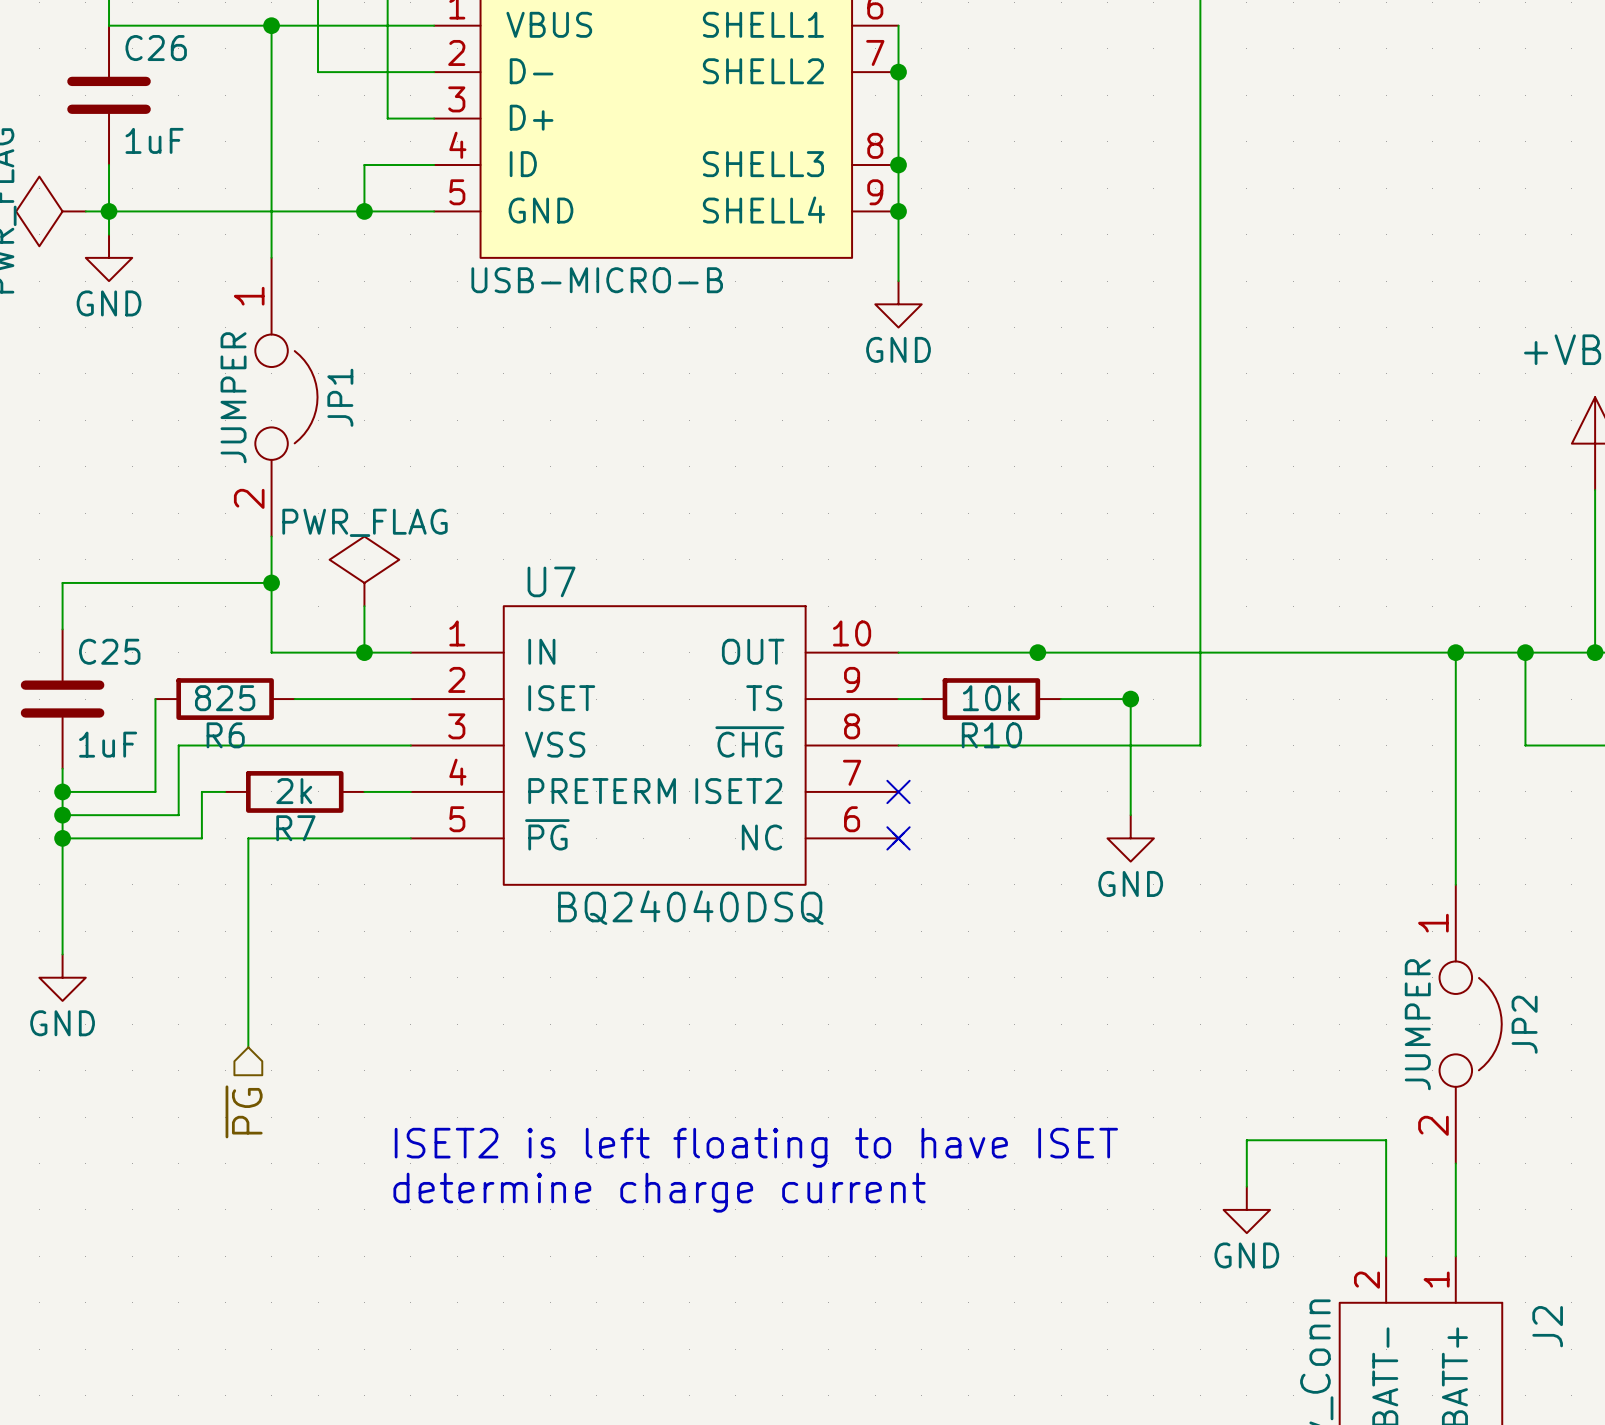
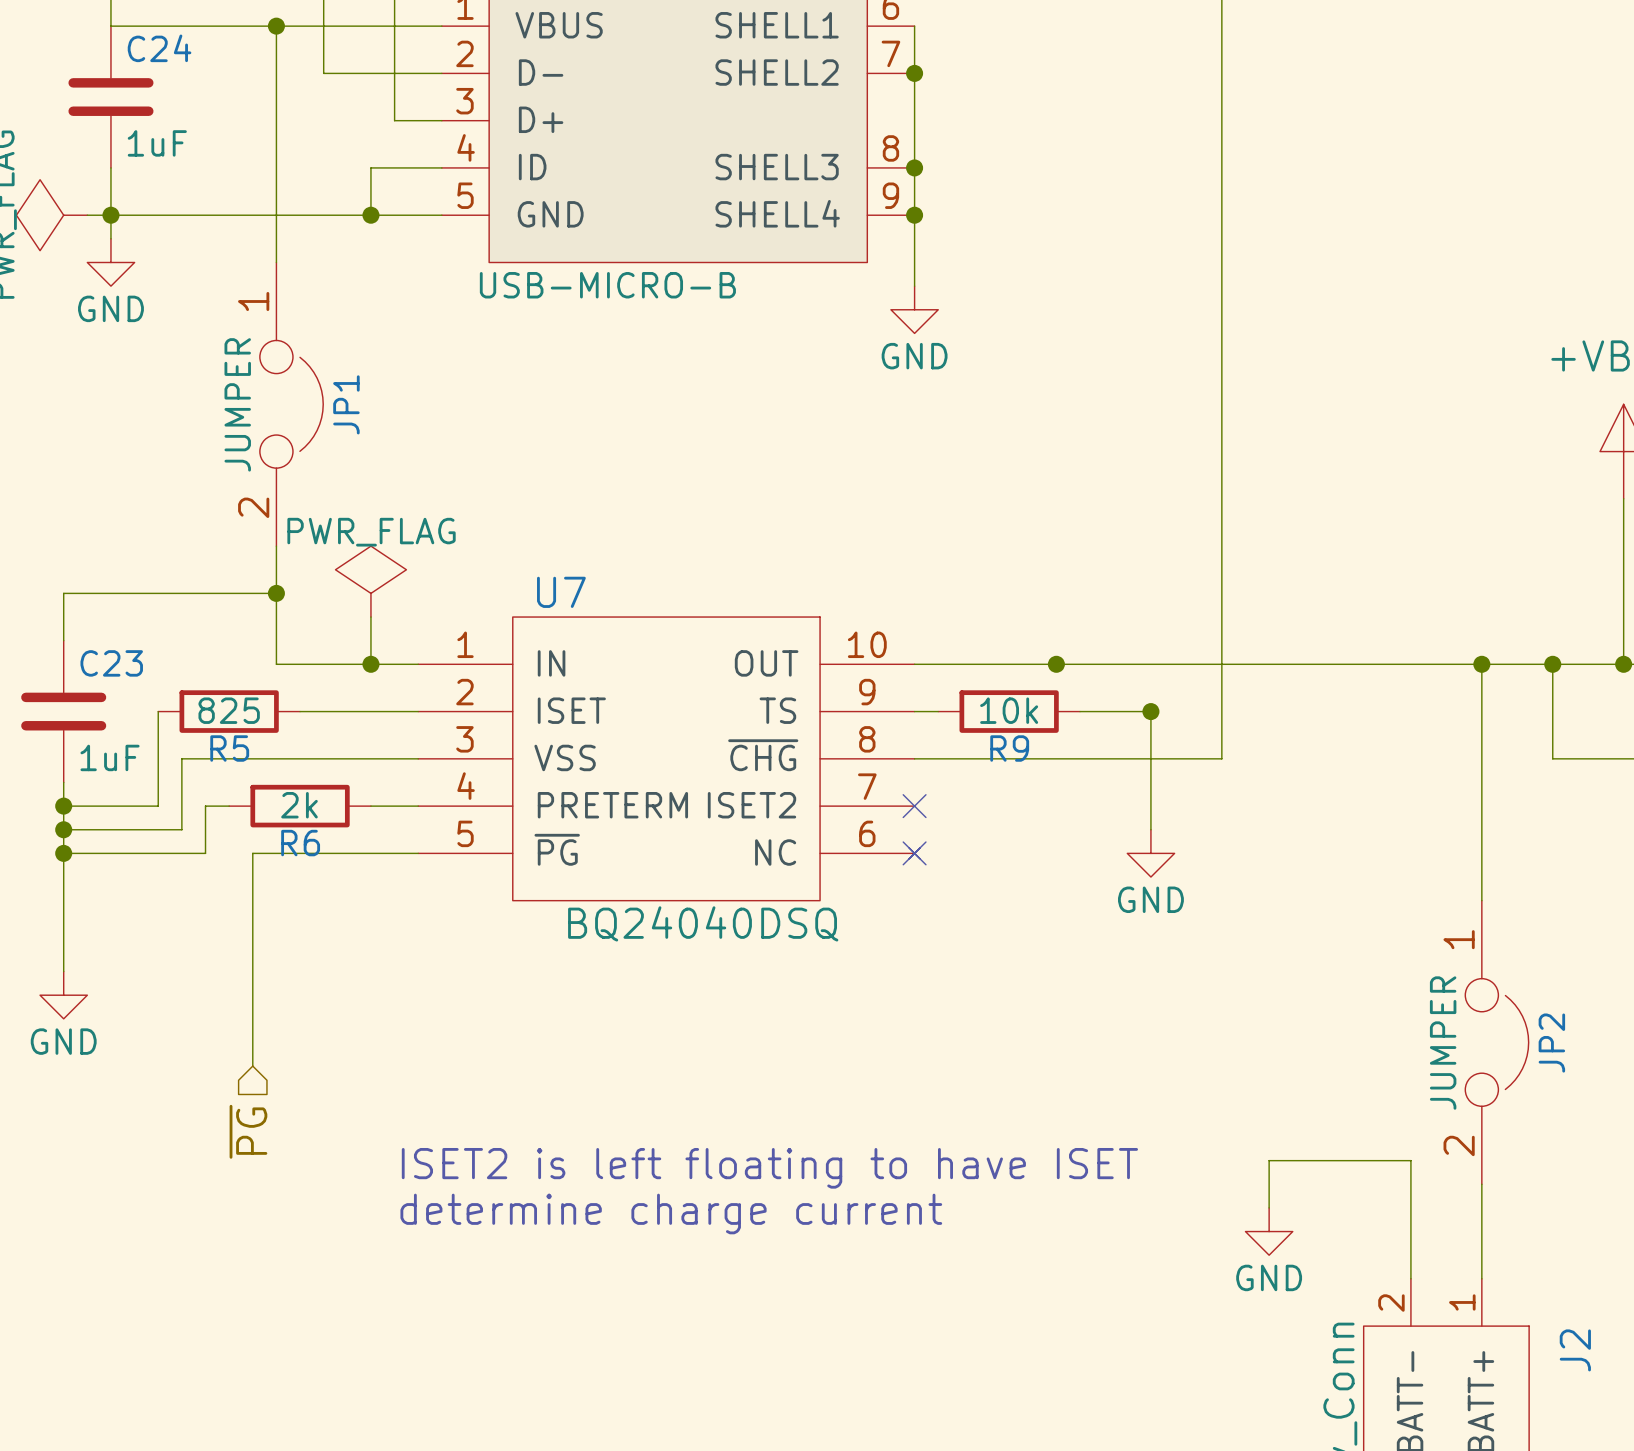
C26 name: C26 (156, 48) -> C24 (159, 48)
C25 name: C25 (109, 651) -> C23 (111, 663)
R6 name: R6 (225, 735) -> R5 (229, 748)
R10 name: R10 (991, 735) -> R9 (1009, 748)
R7 name: R7 (295, 828) -> R6 (300, 843)

